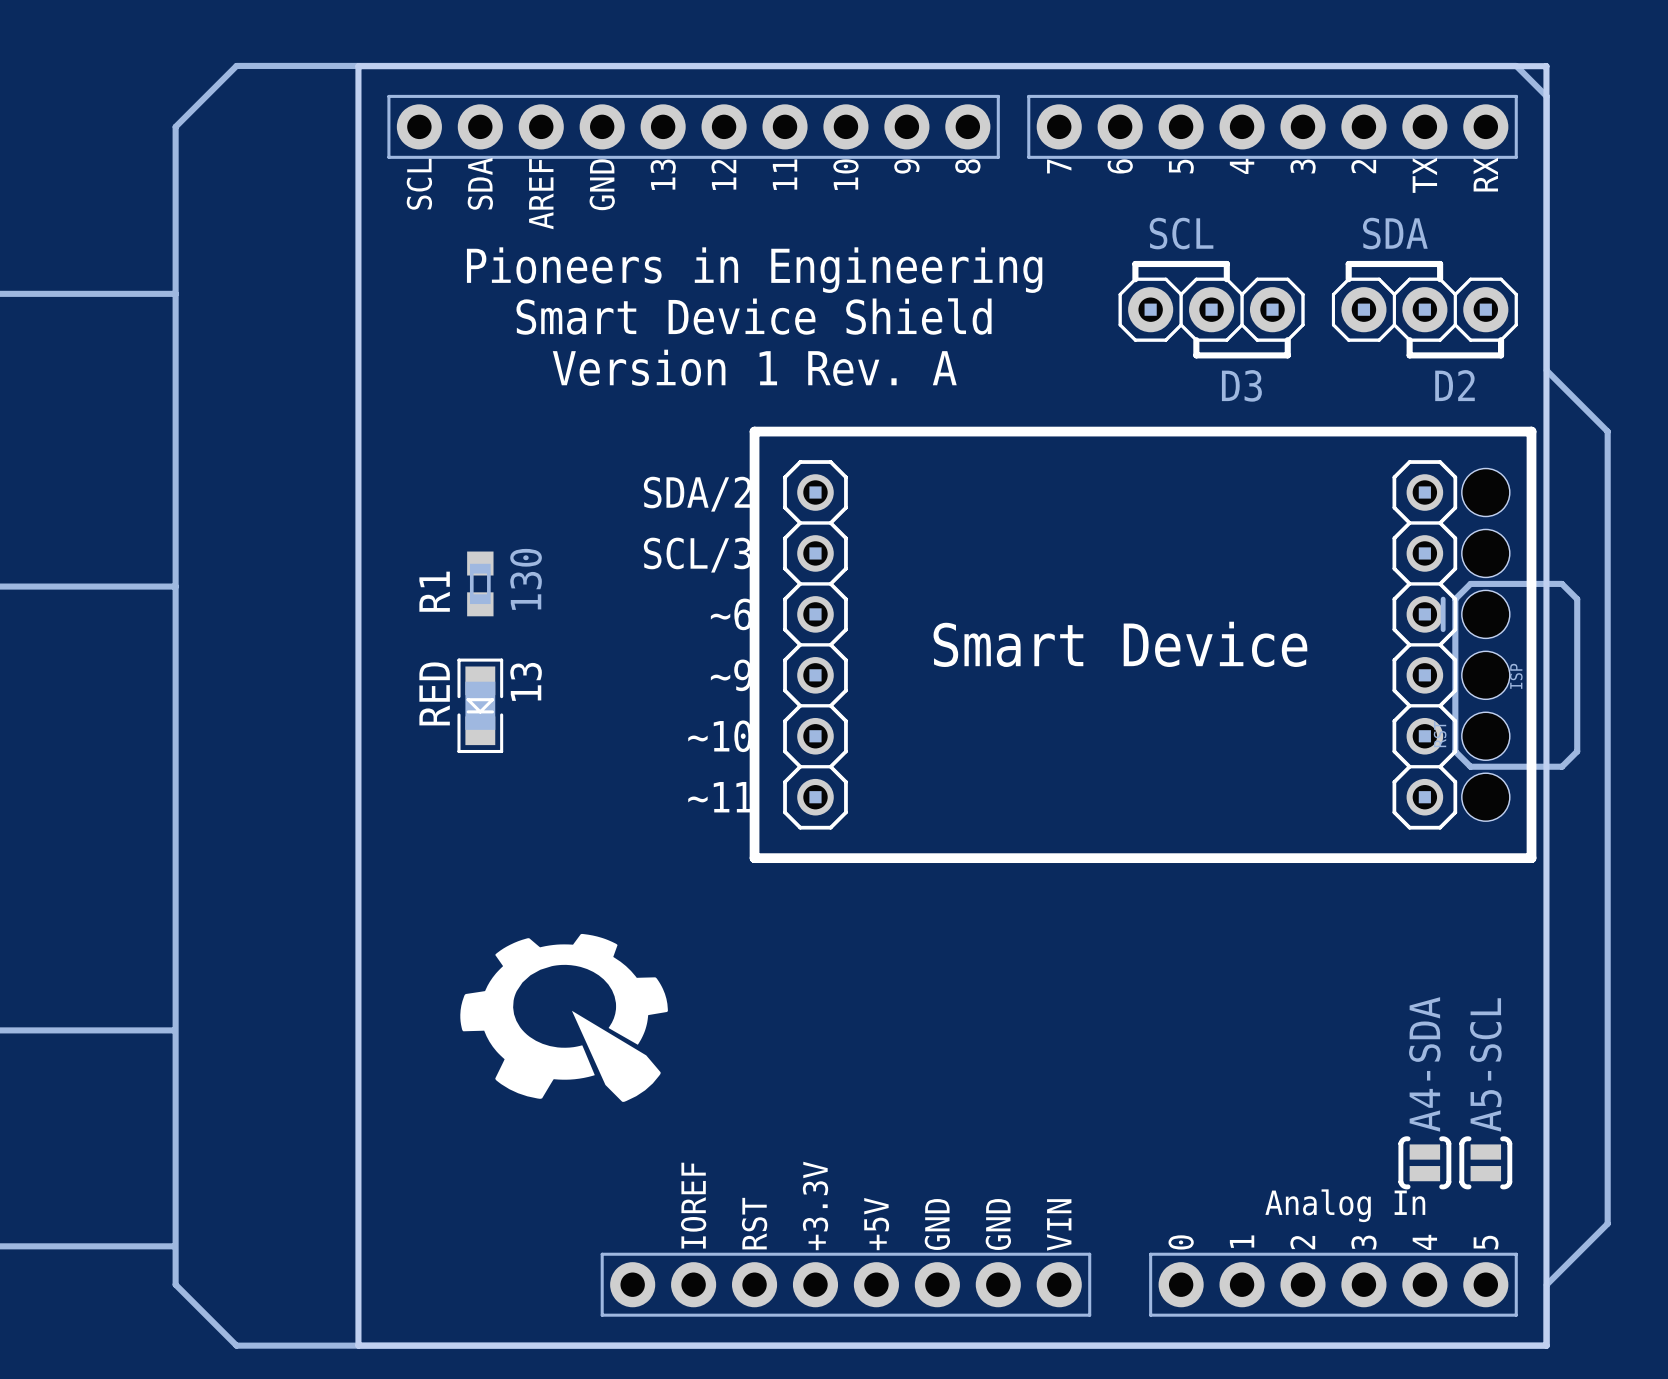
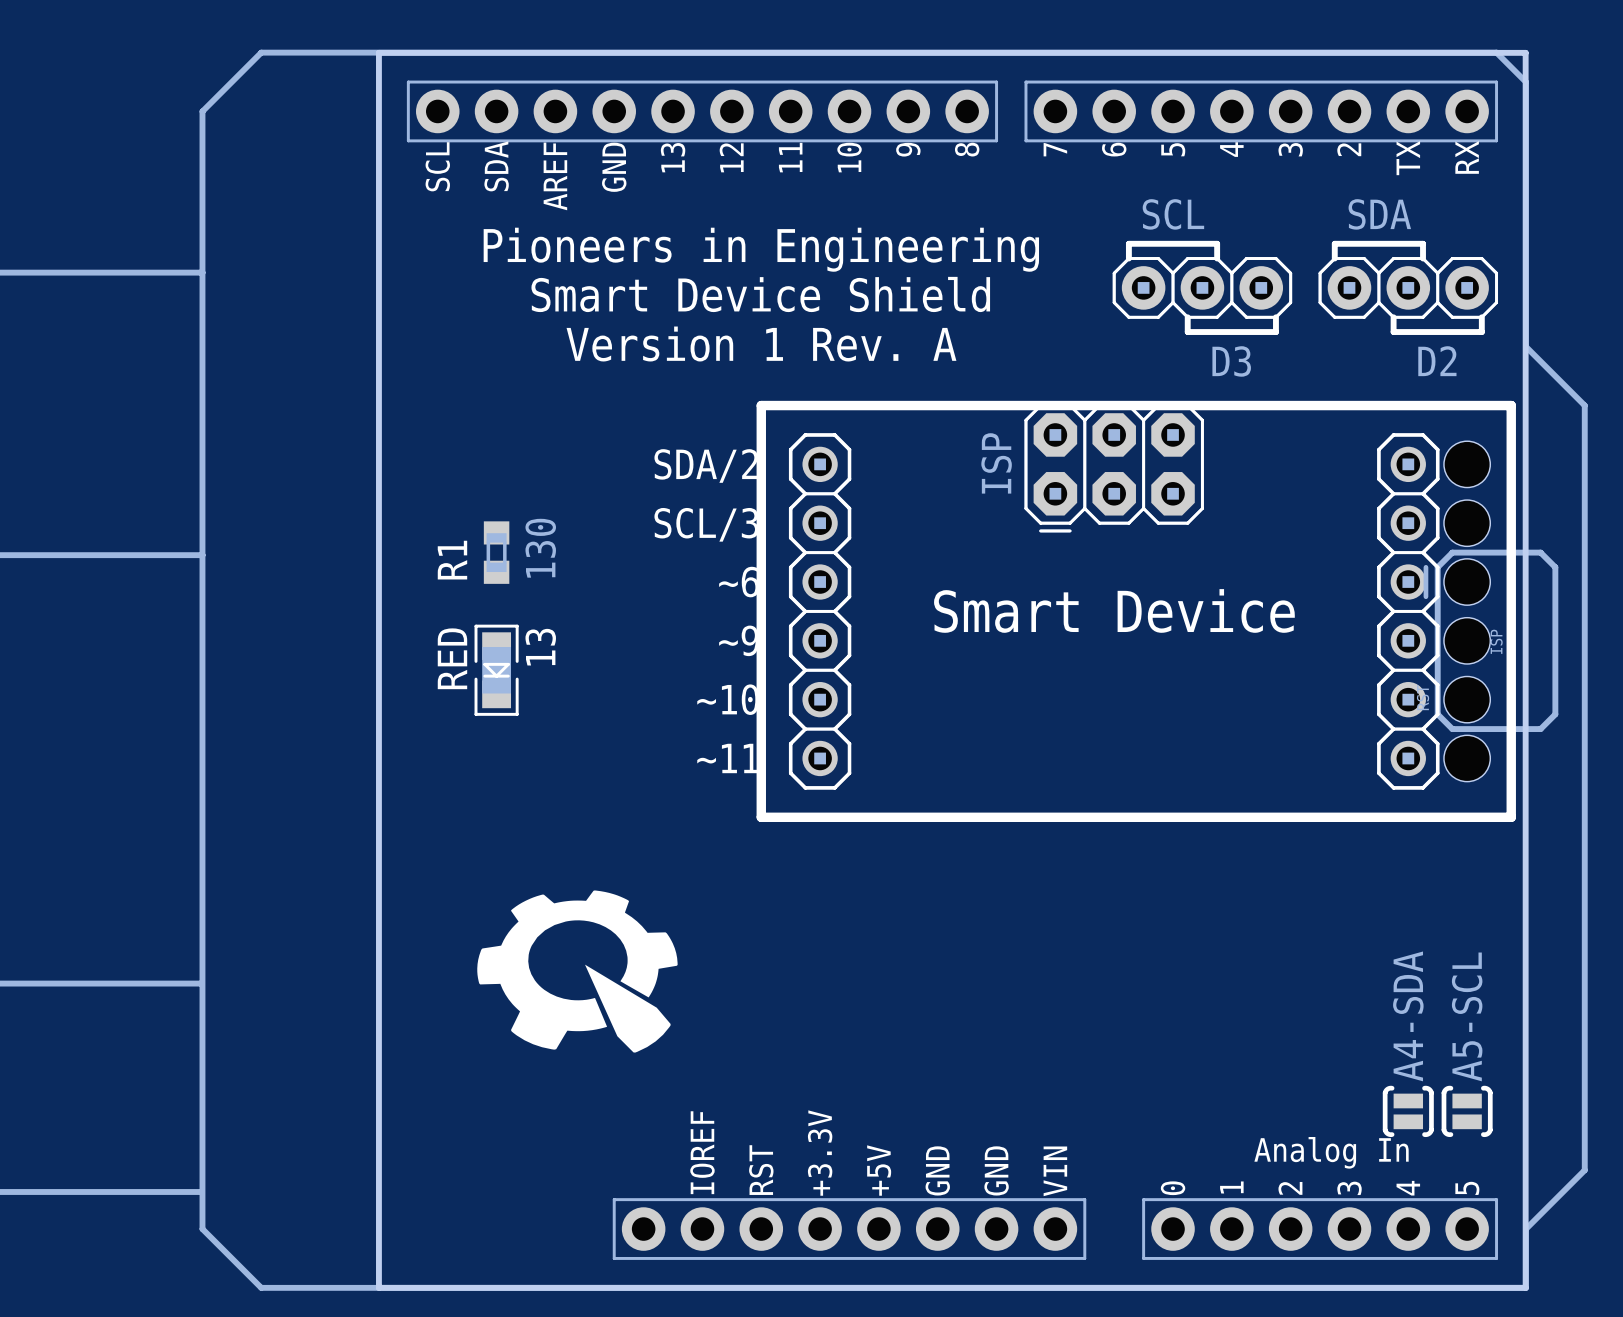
part: none -> ISP (1114, 468)

